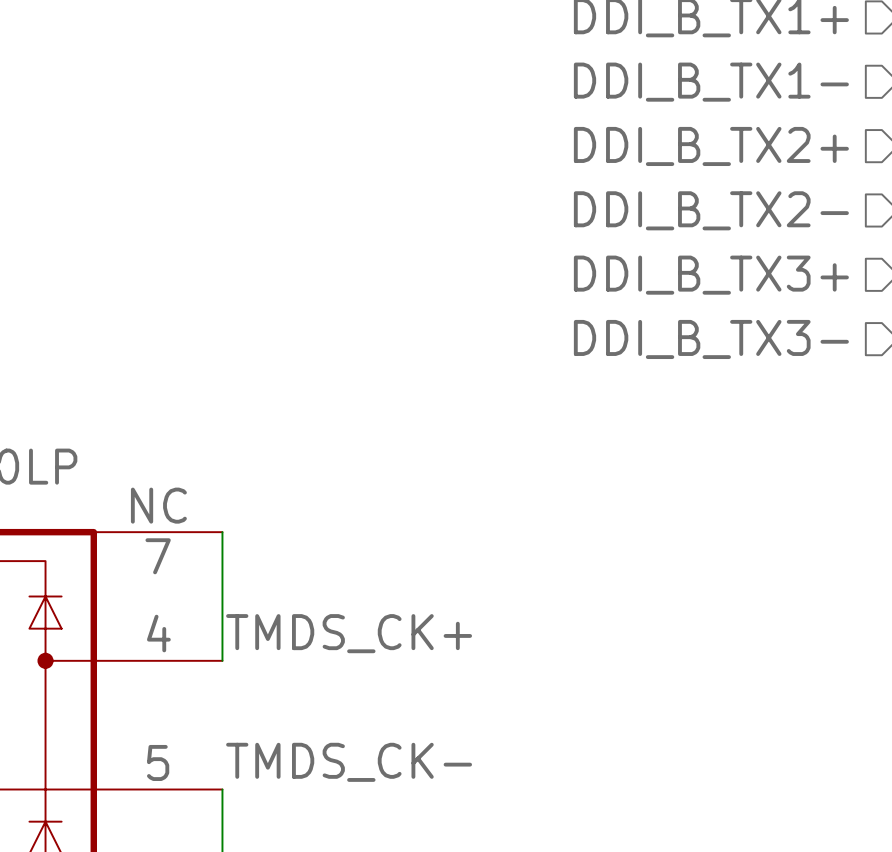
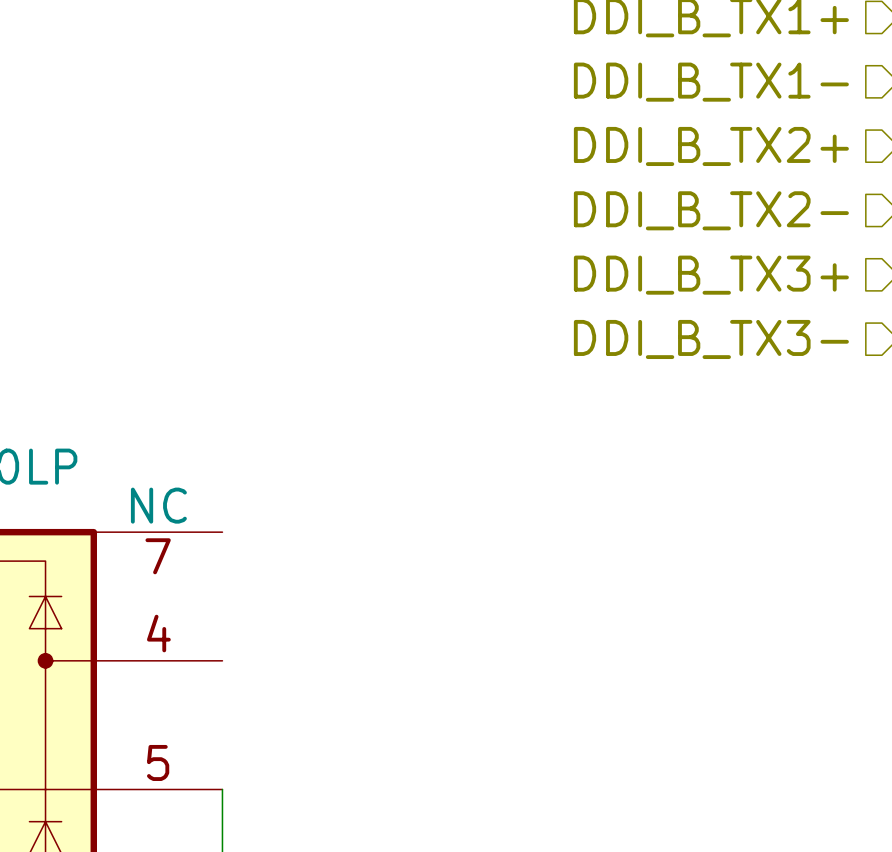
wire: (222, 532) (222, 660) -> none
label: TMDS_CK+ (349, 633) -> none
label: TMDS_CK- (349, 762) -> none

